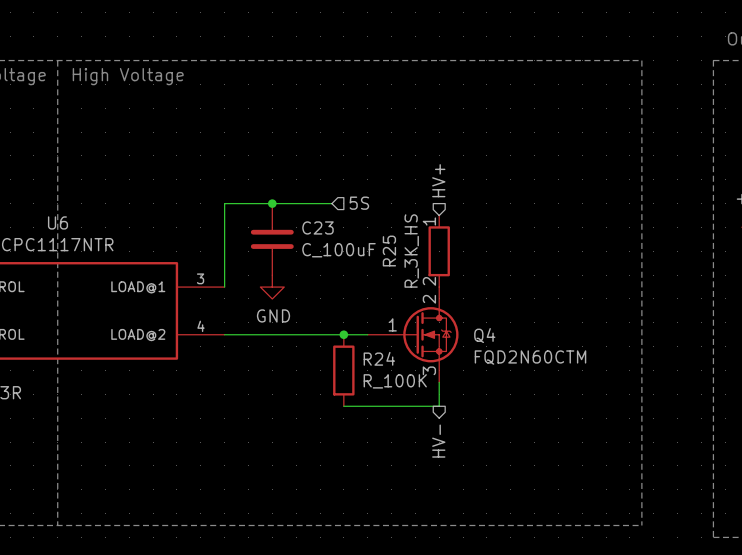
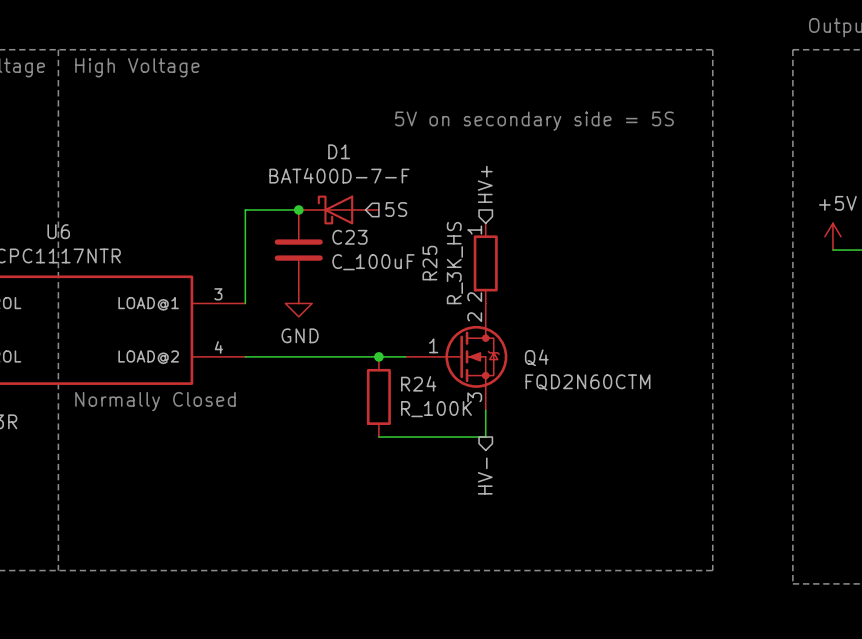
text: none -> 5V on secondary side = 5S (534, 121)
D1: none -> BAT400D-7-F (338, 209)
text: none -> Normally Closed (155, 401)

